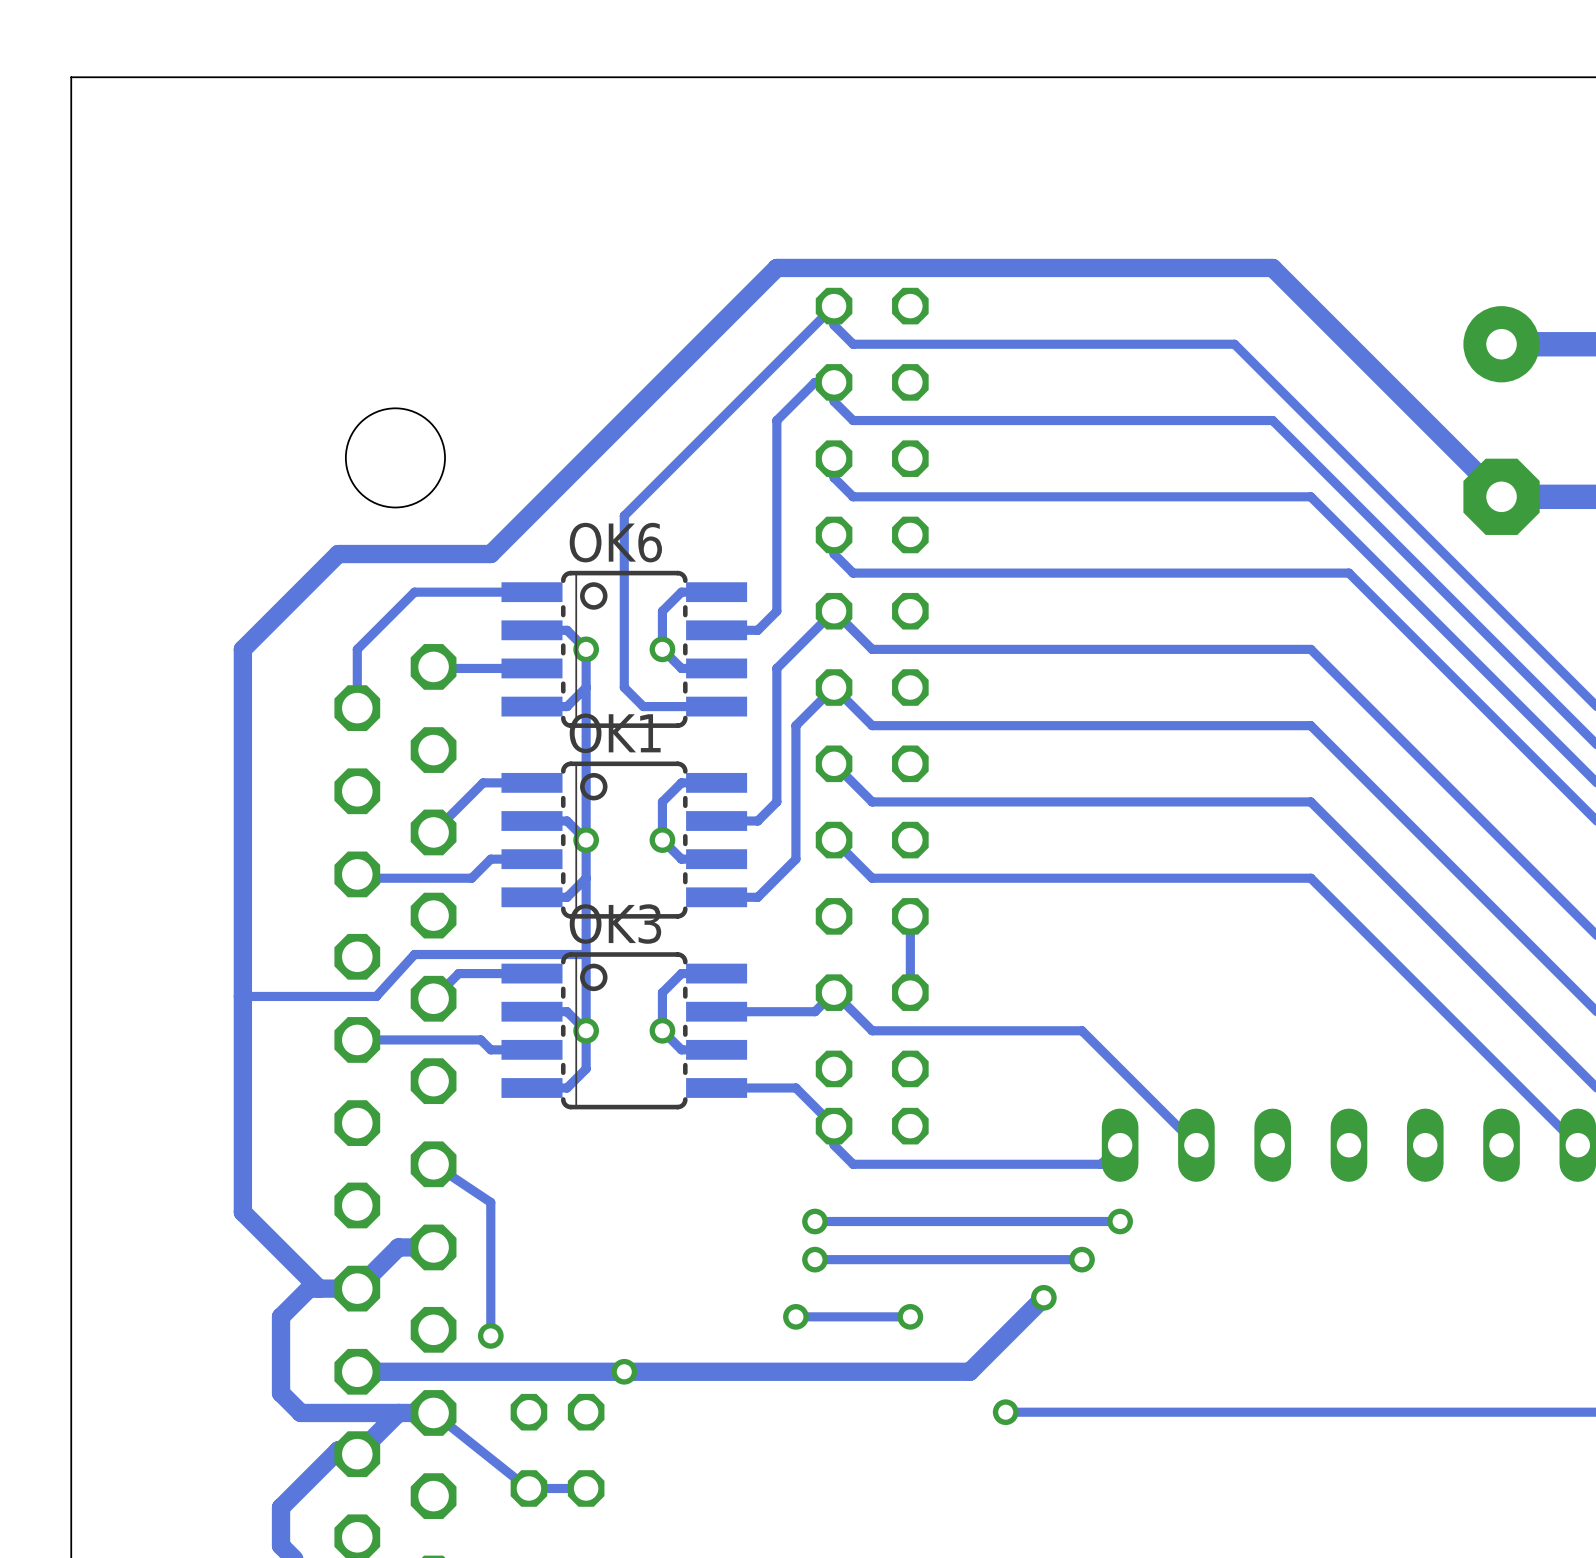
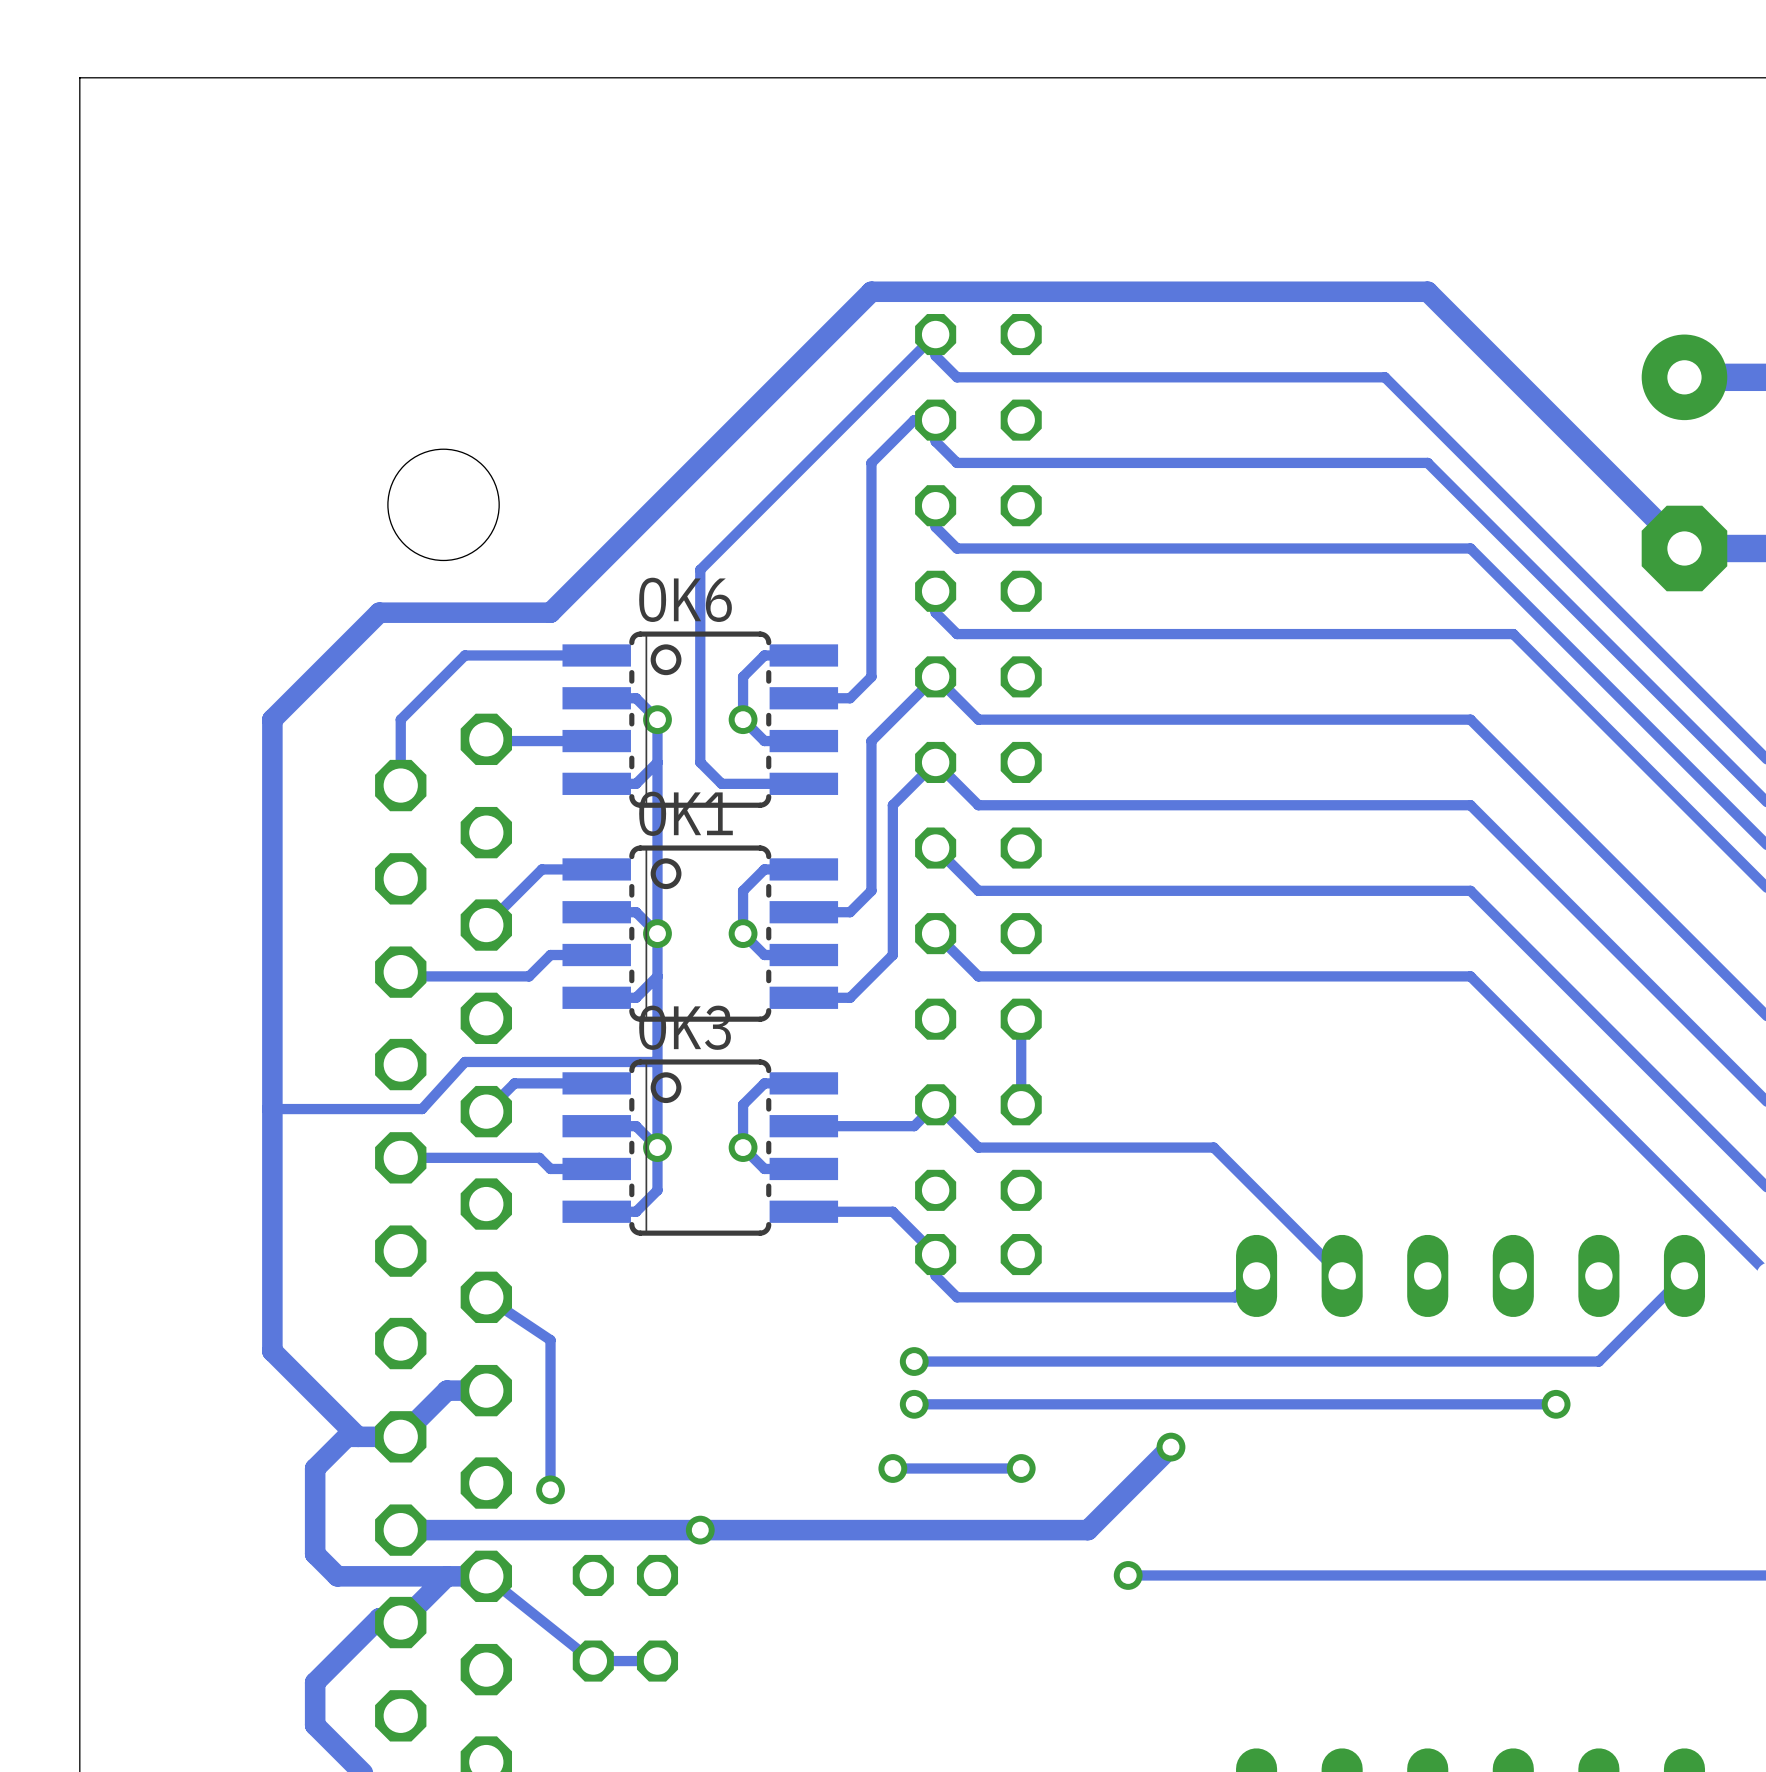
track: none -> (1684, 1275) (1598, 1361) (1256, 1361)
via: (1120, 1221) -> none
via: (1081, 1259) -> none
track: none -> (1556, 1404) (1213, 1404)
via: none -> (1556, 1404)

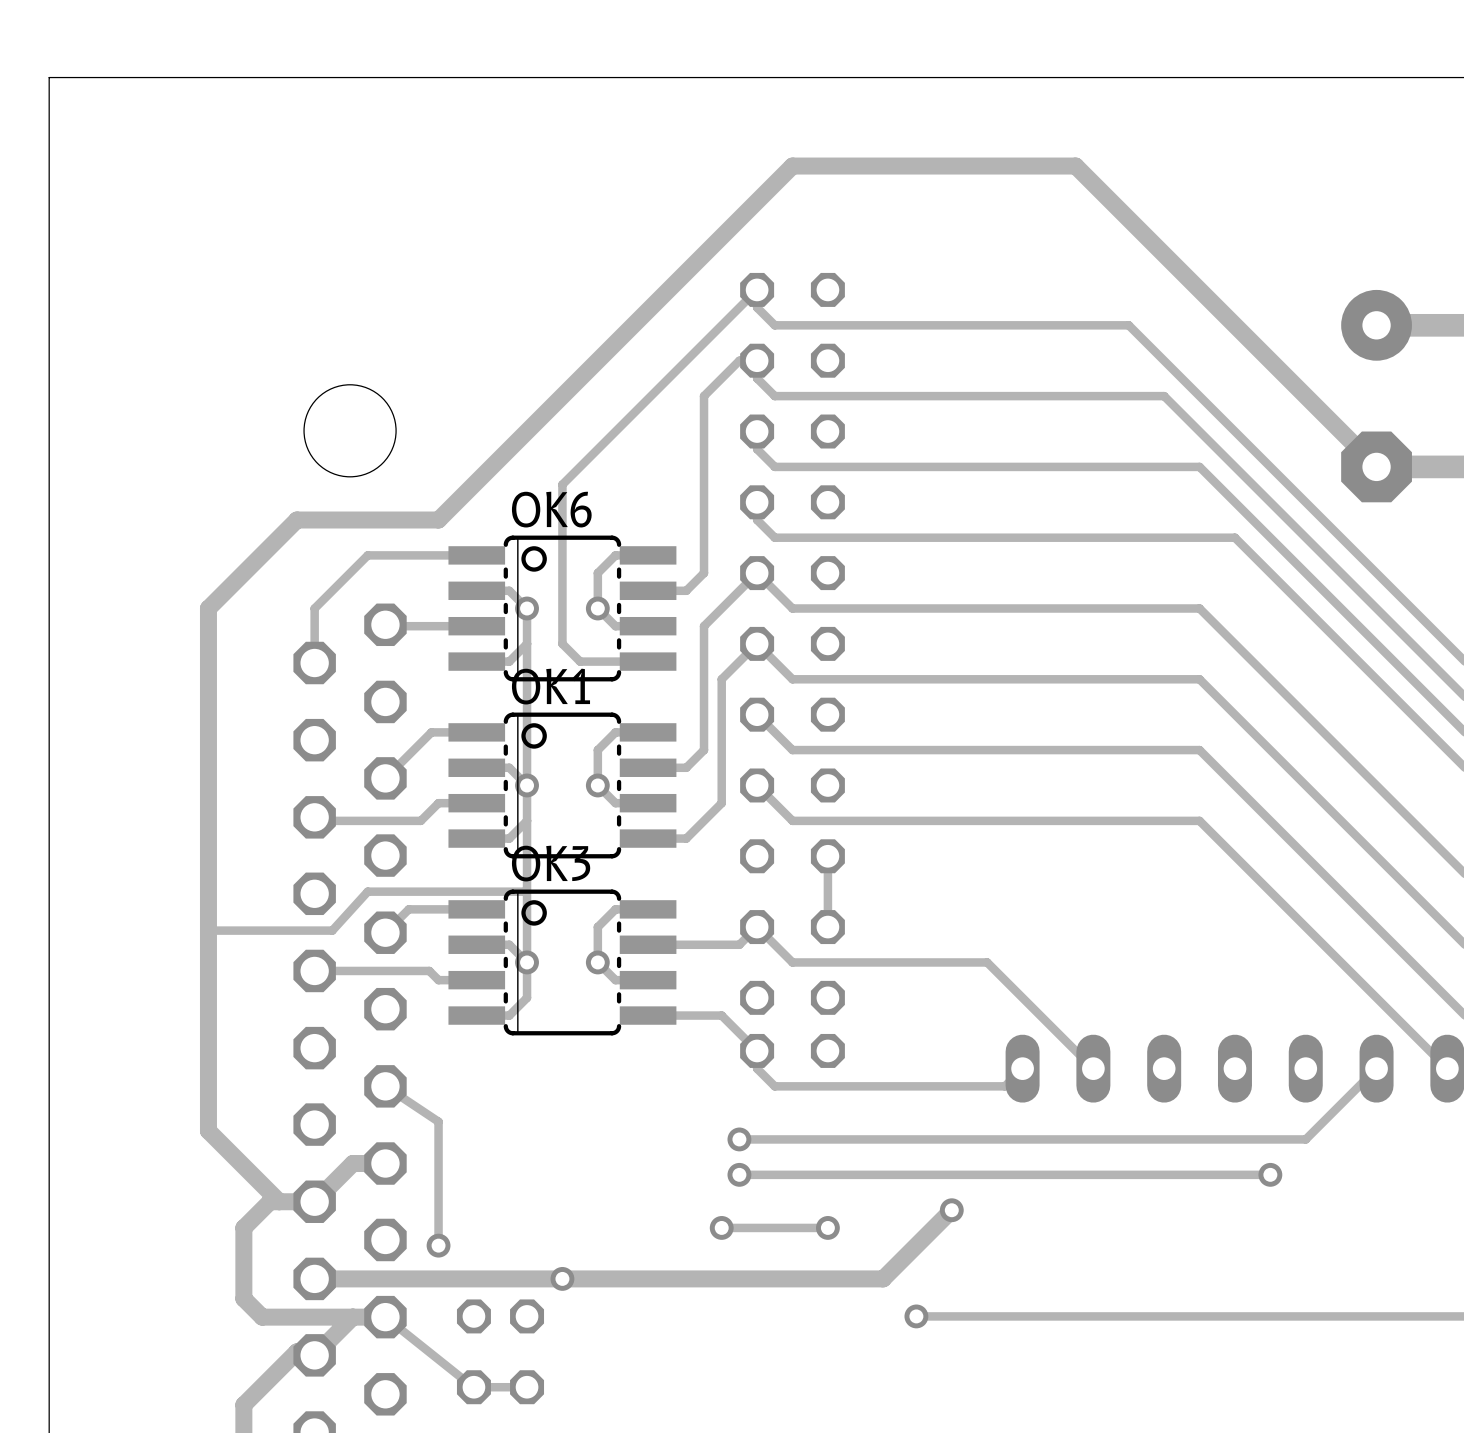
track: (1427, 291) (871, 291) -> (1164, 254) (1075, 166) (792, 166) (704, 254)

